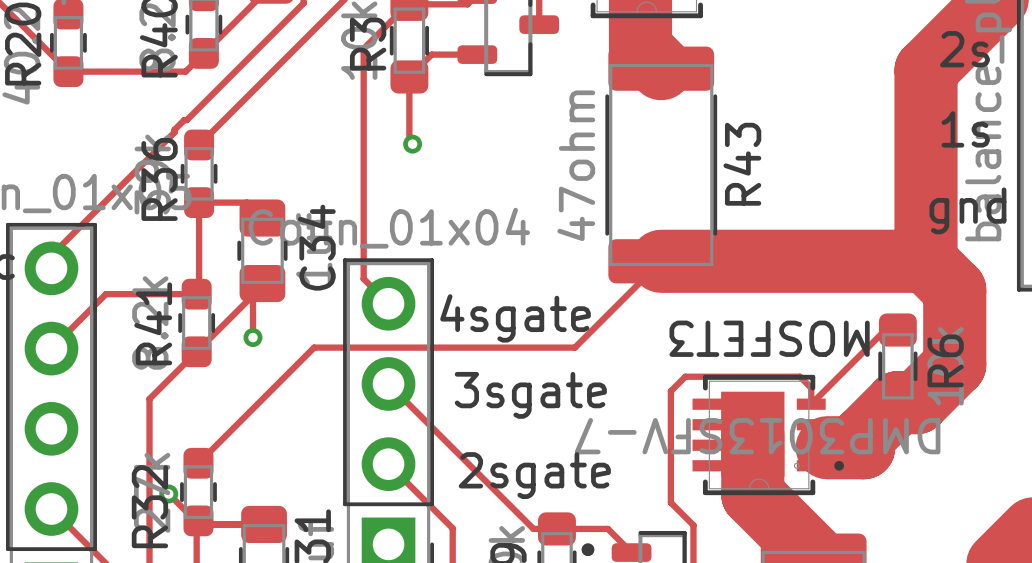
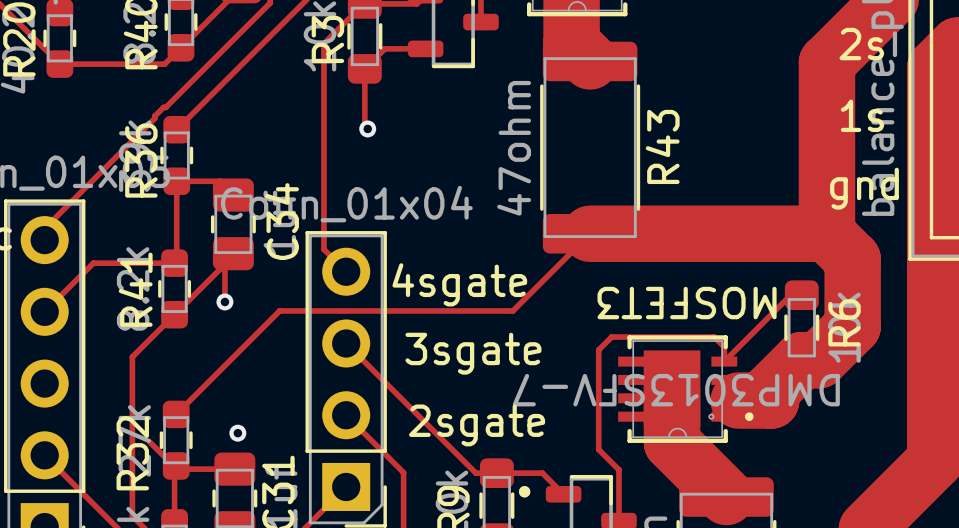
via position: (168, 493) -> (237, 433)

